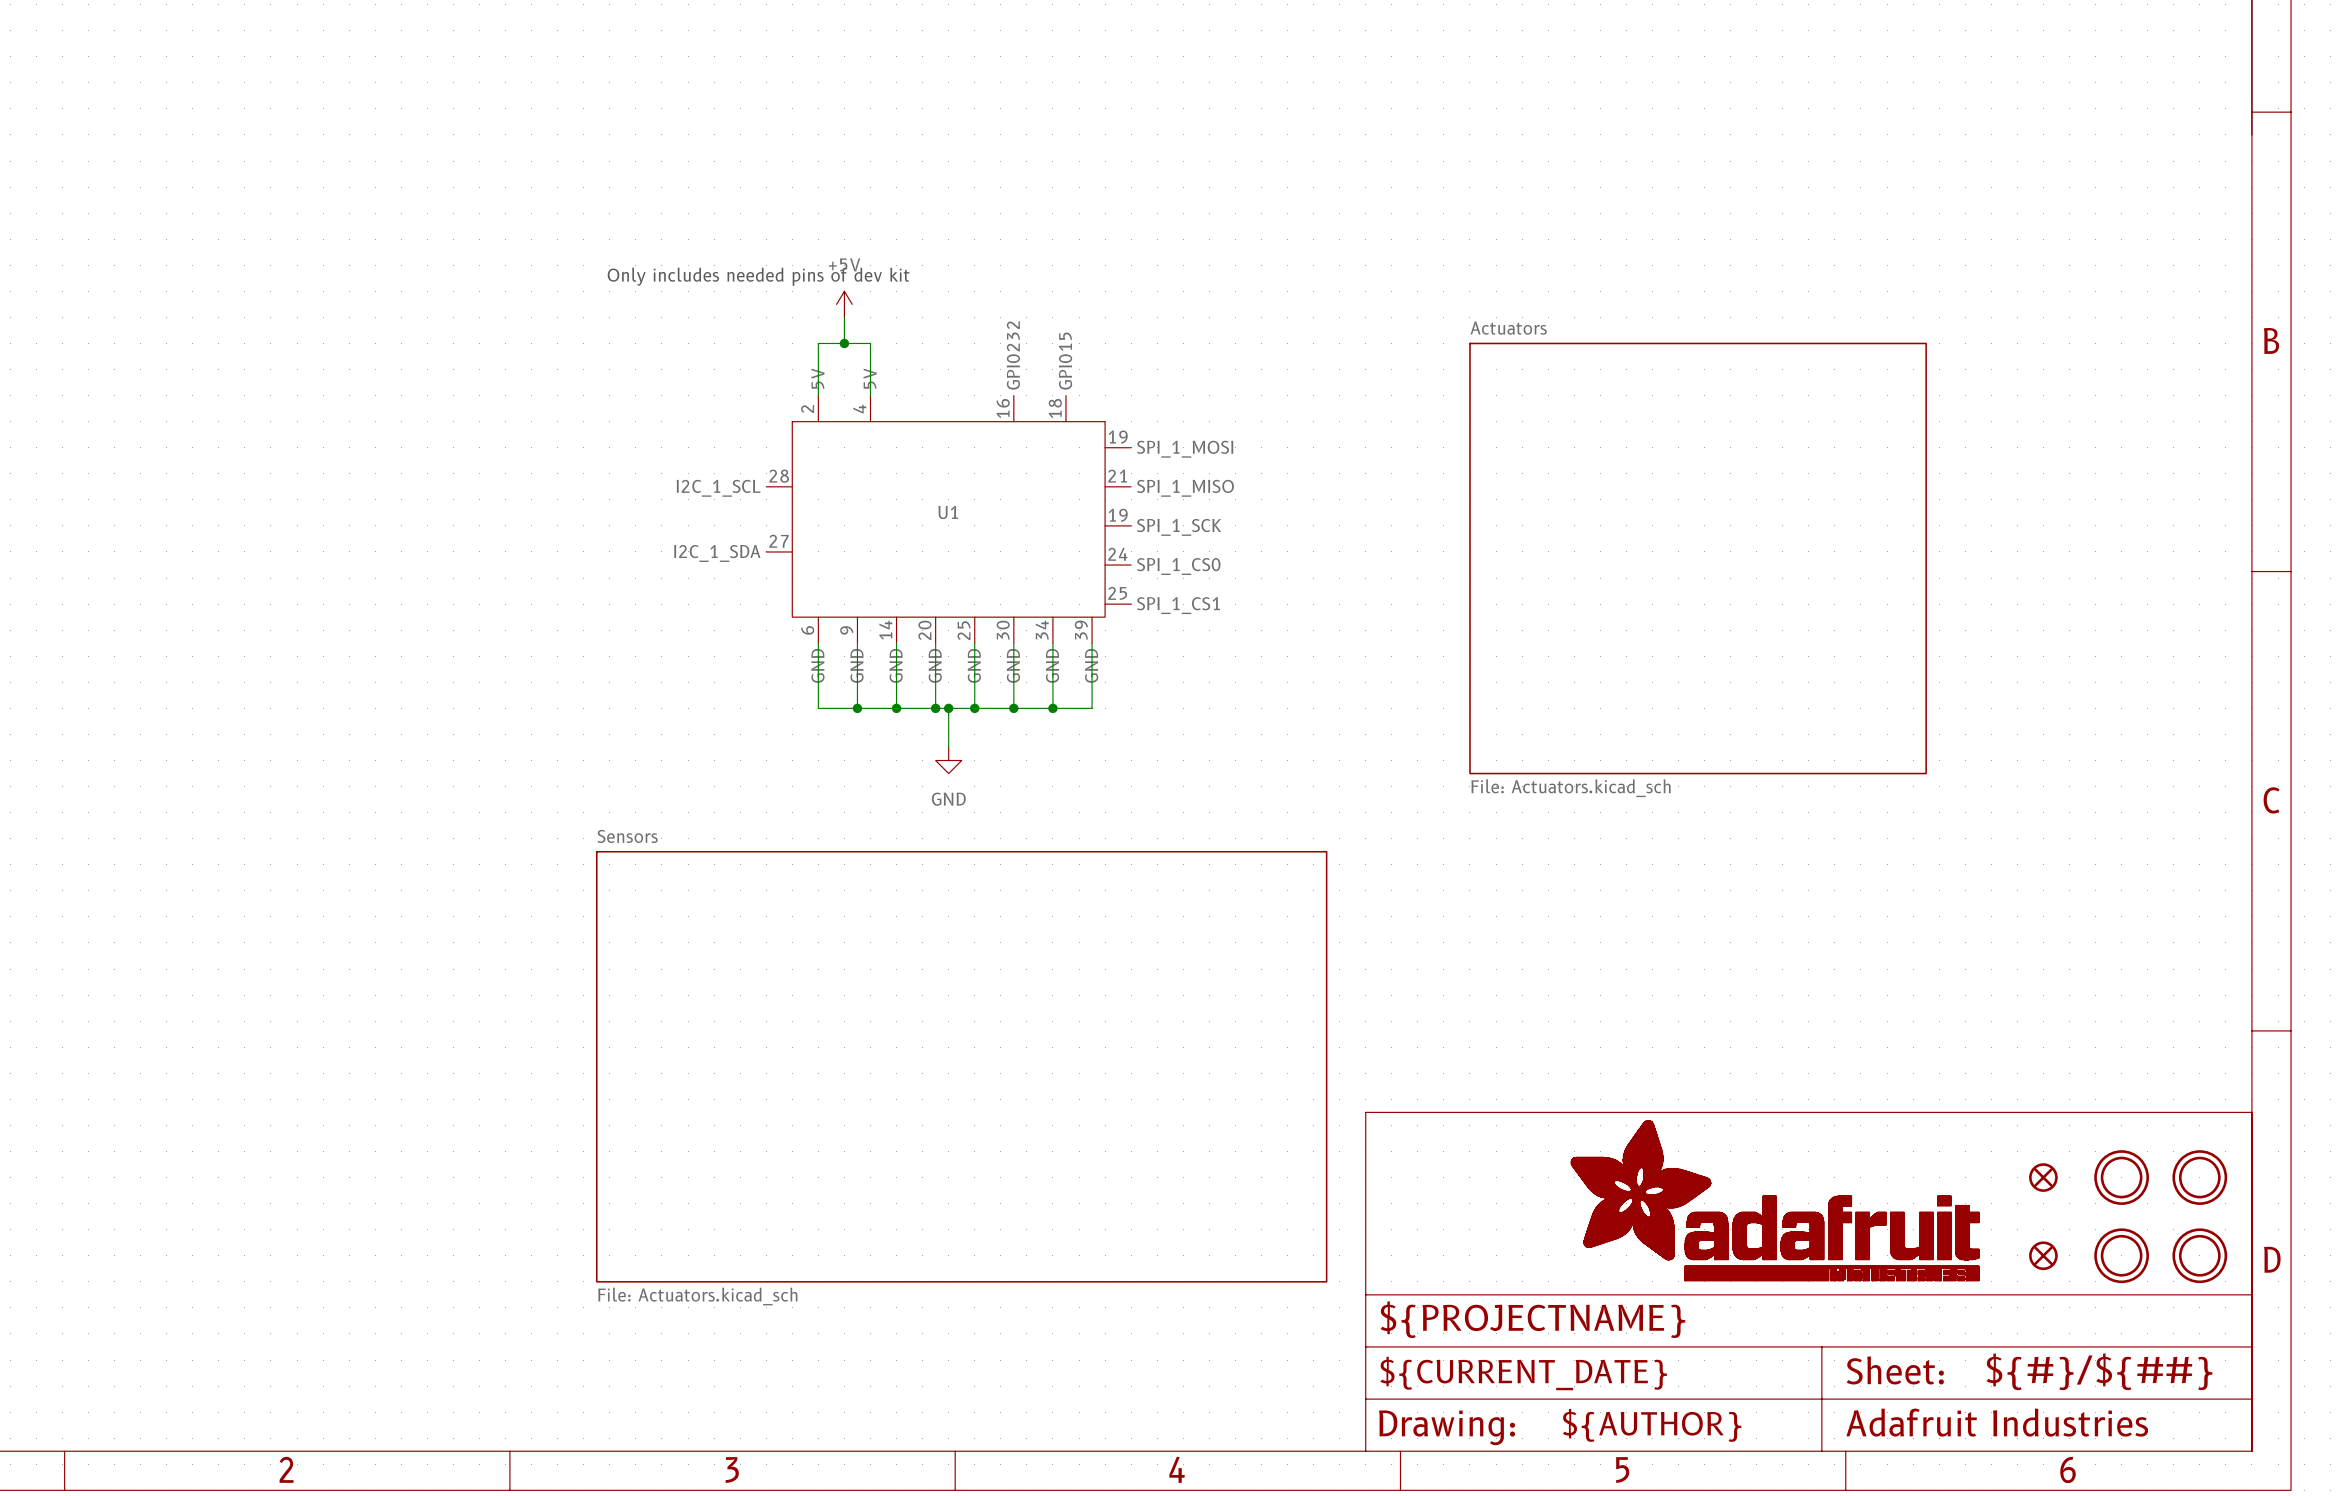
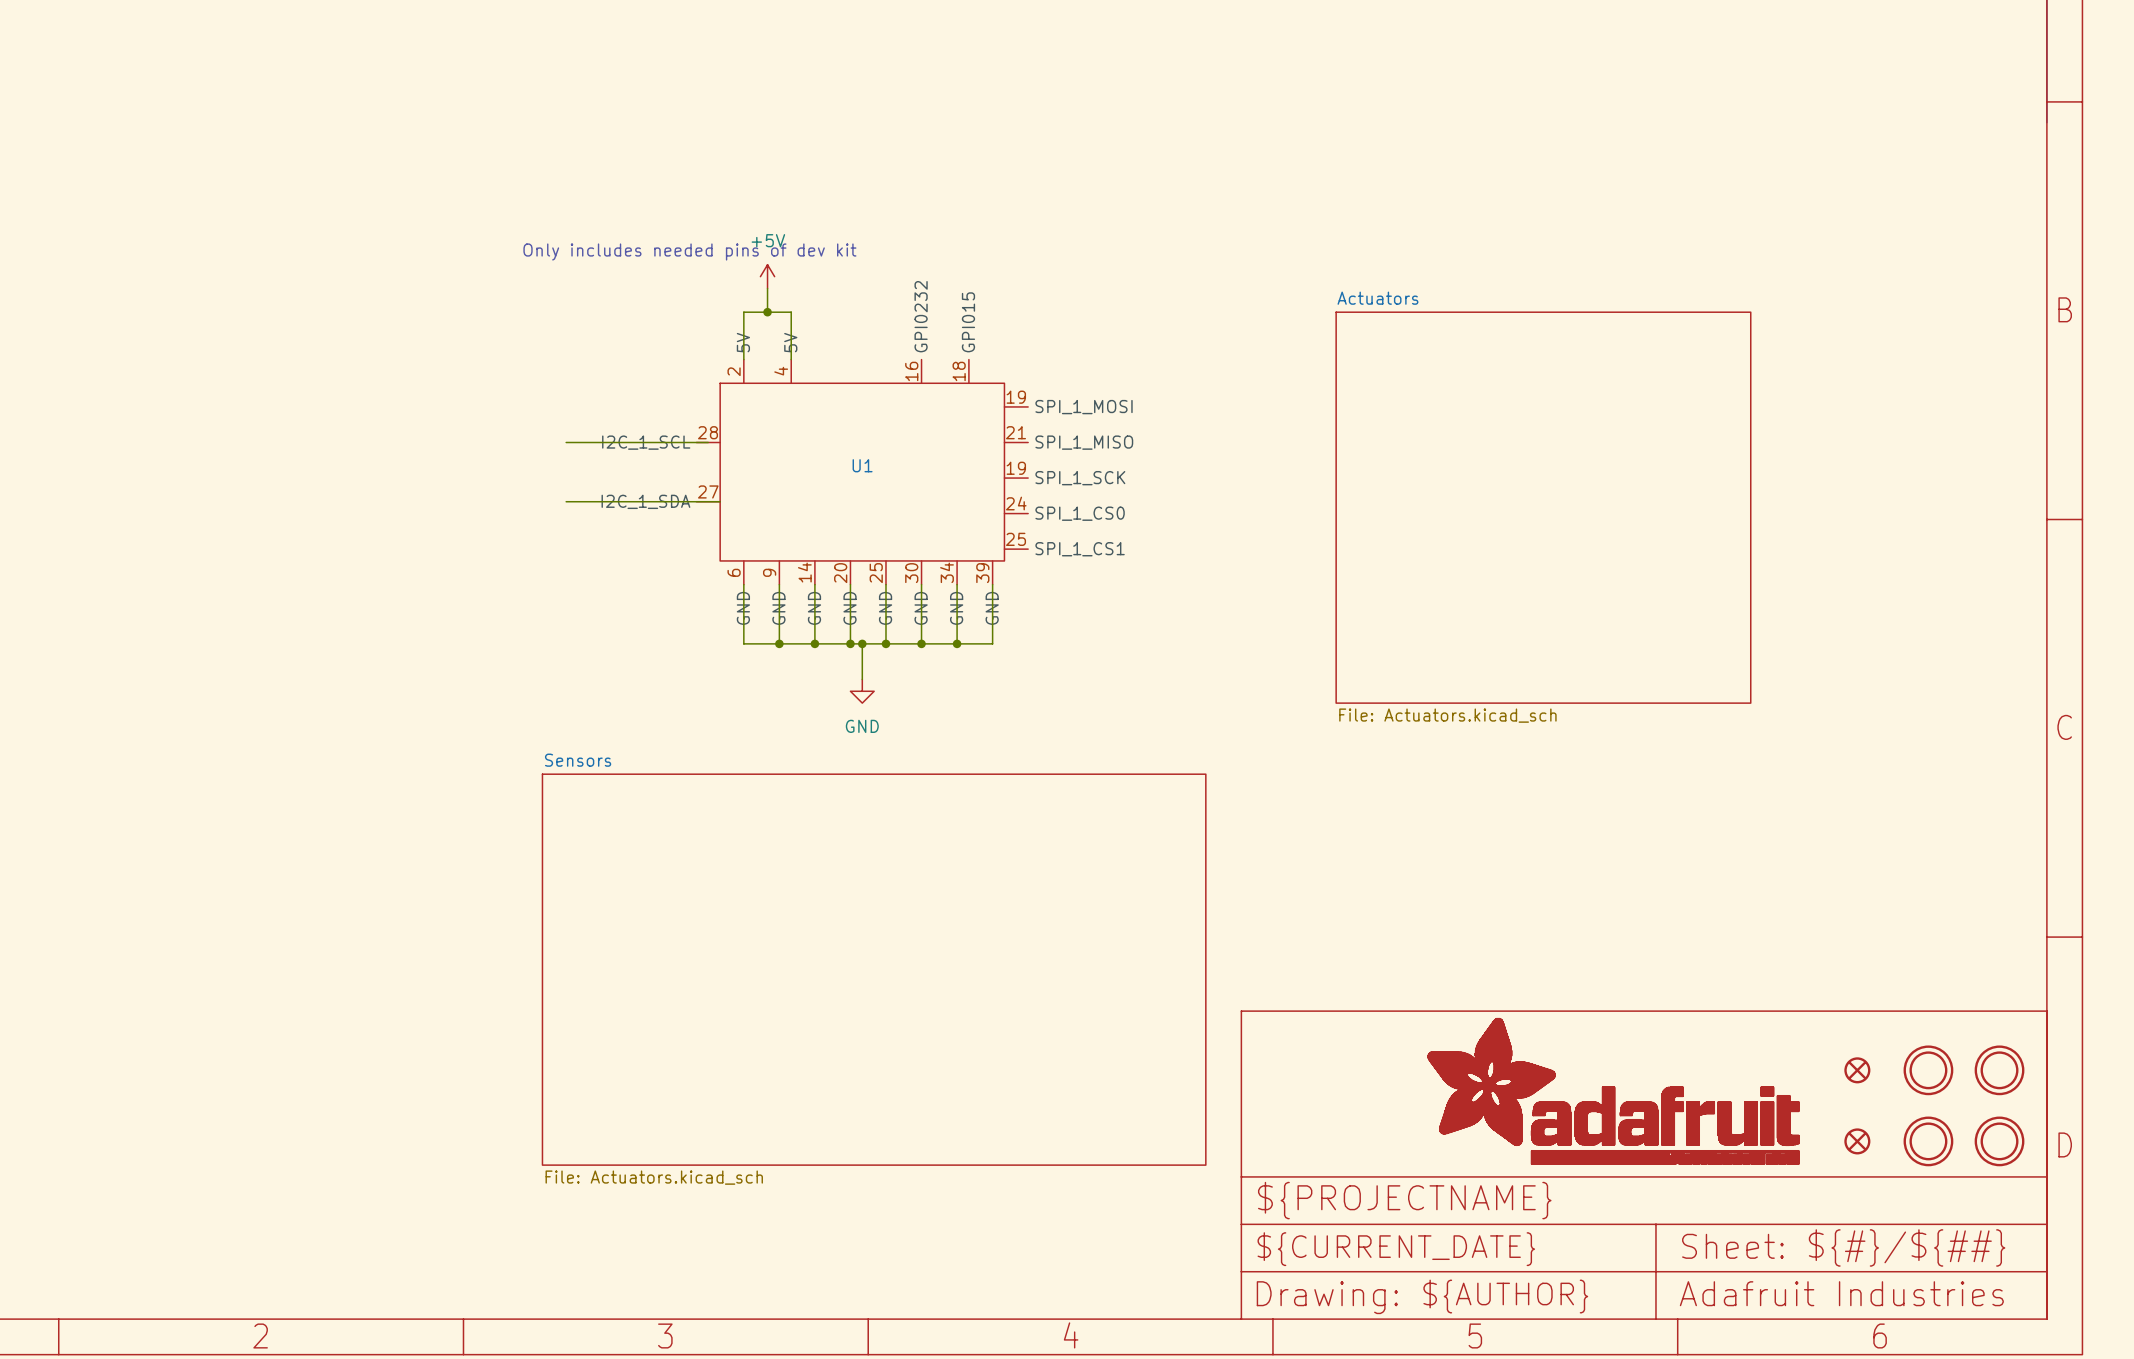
wire: none -> (566, 442) (708, 442)
wire: none -> (566, 501) (720, 501)

